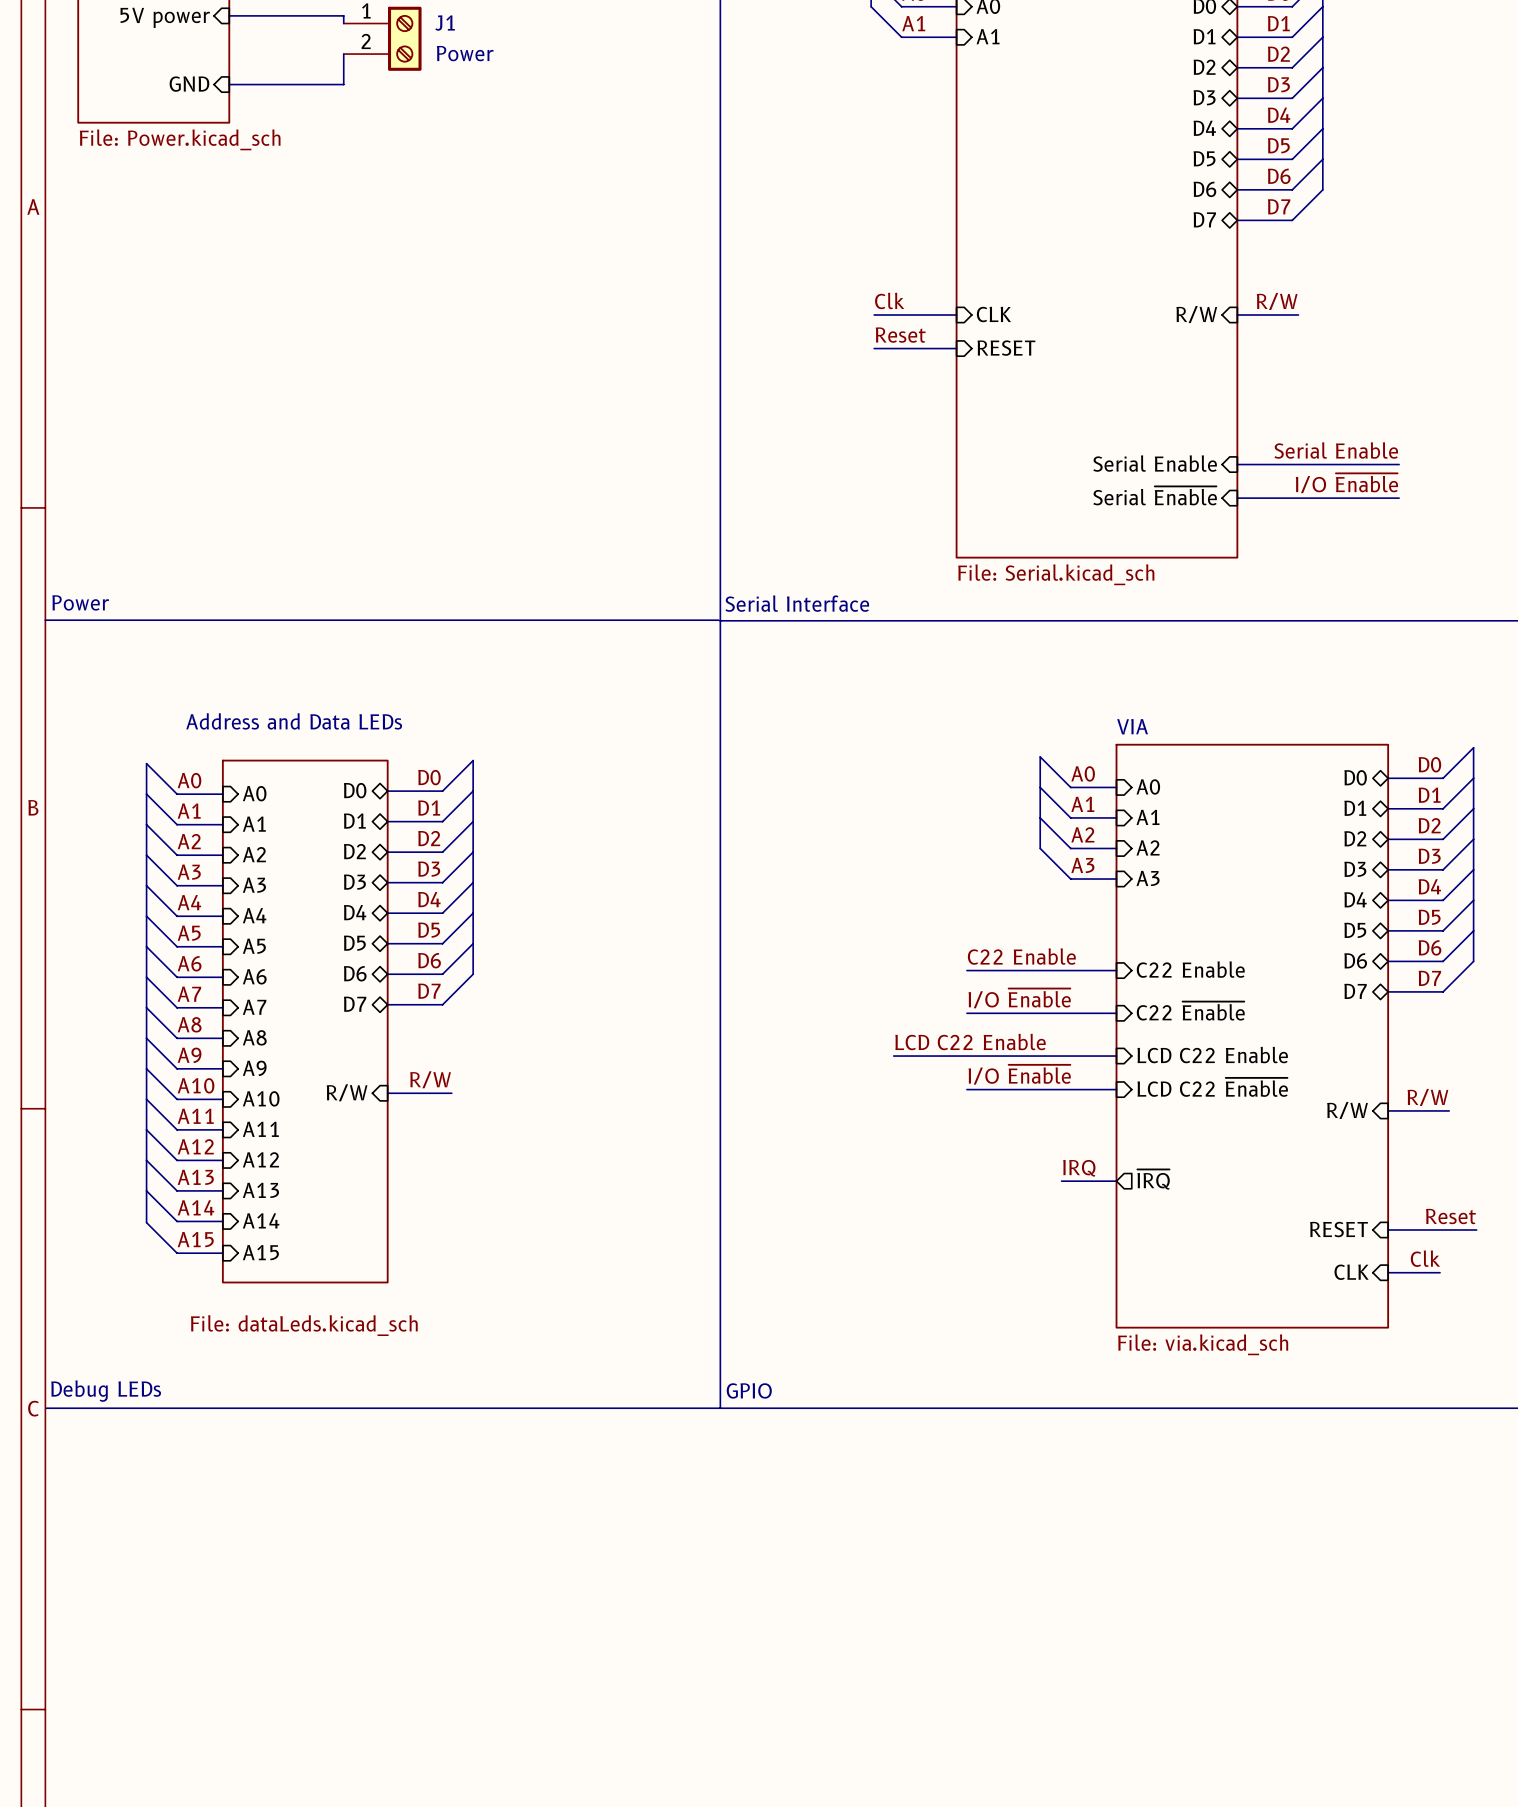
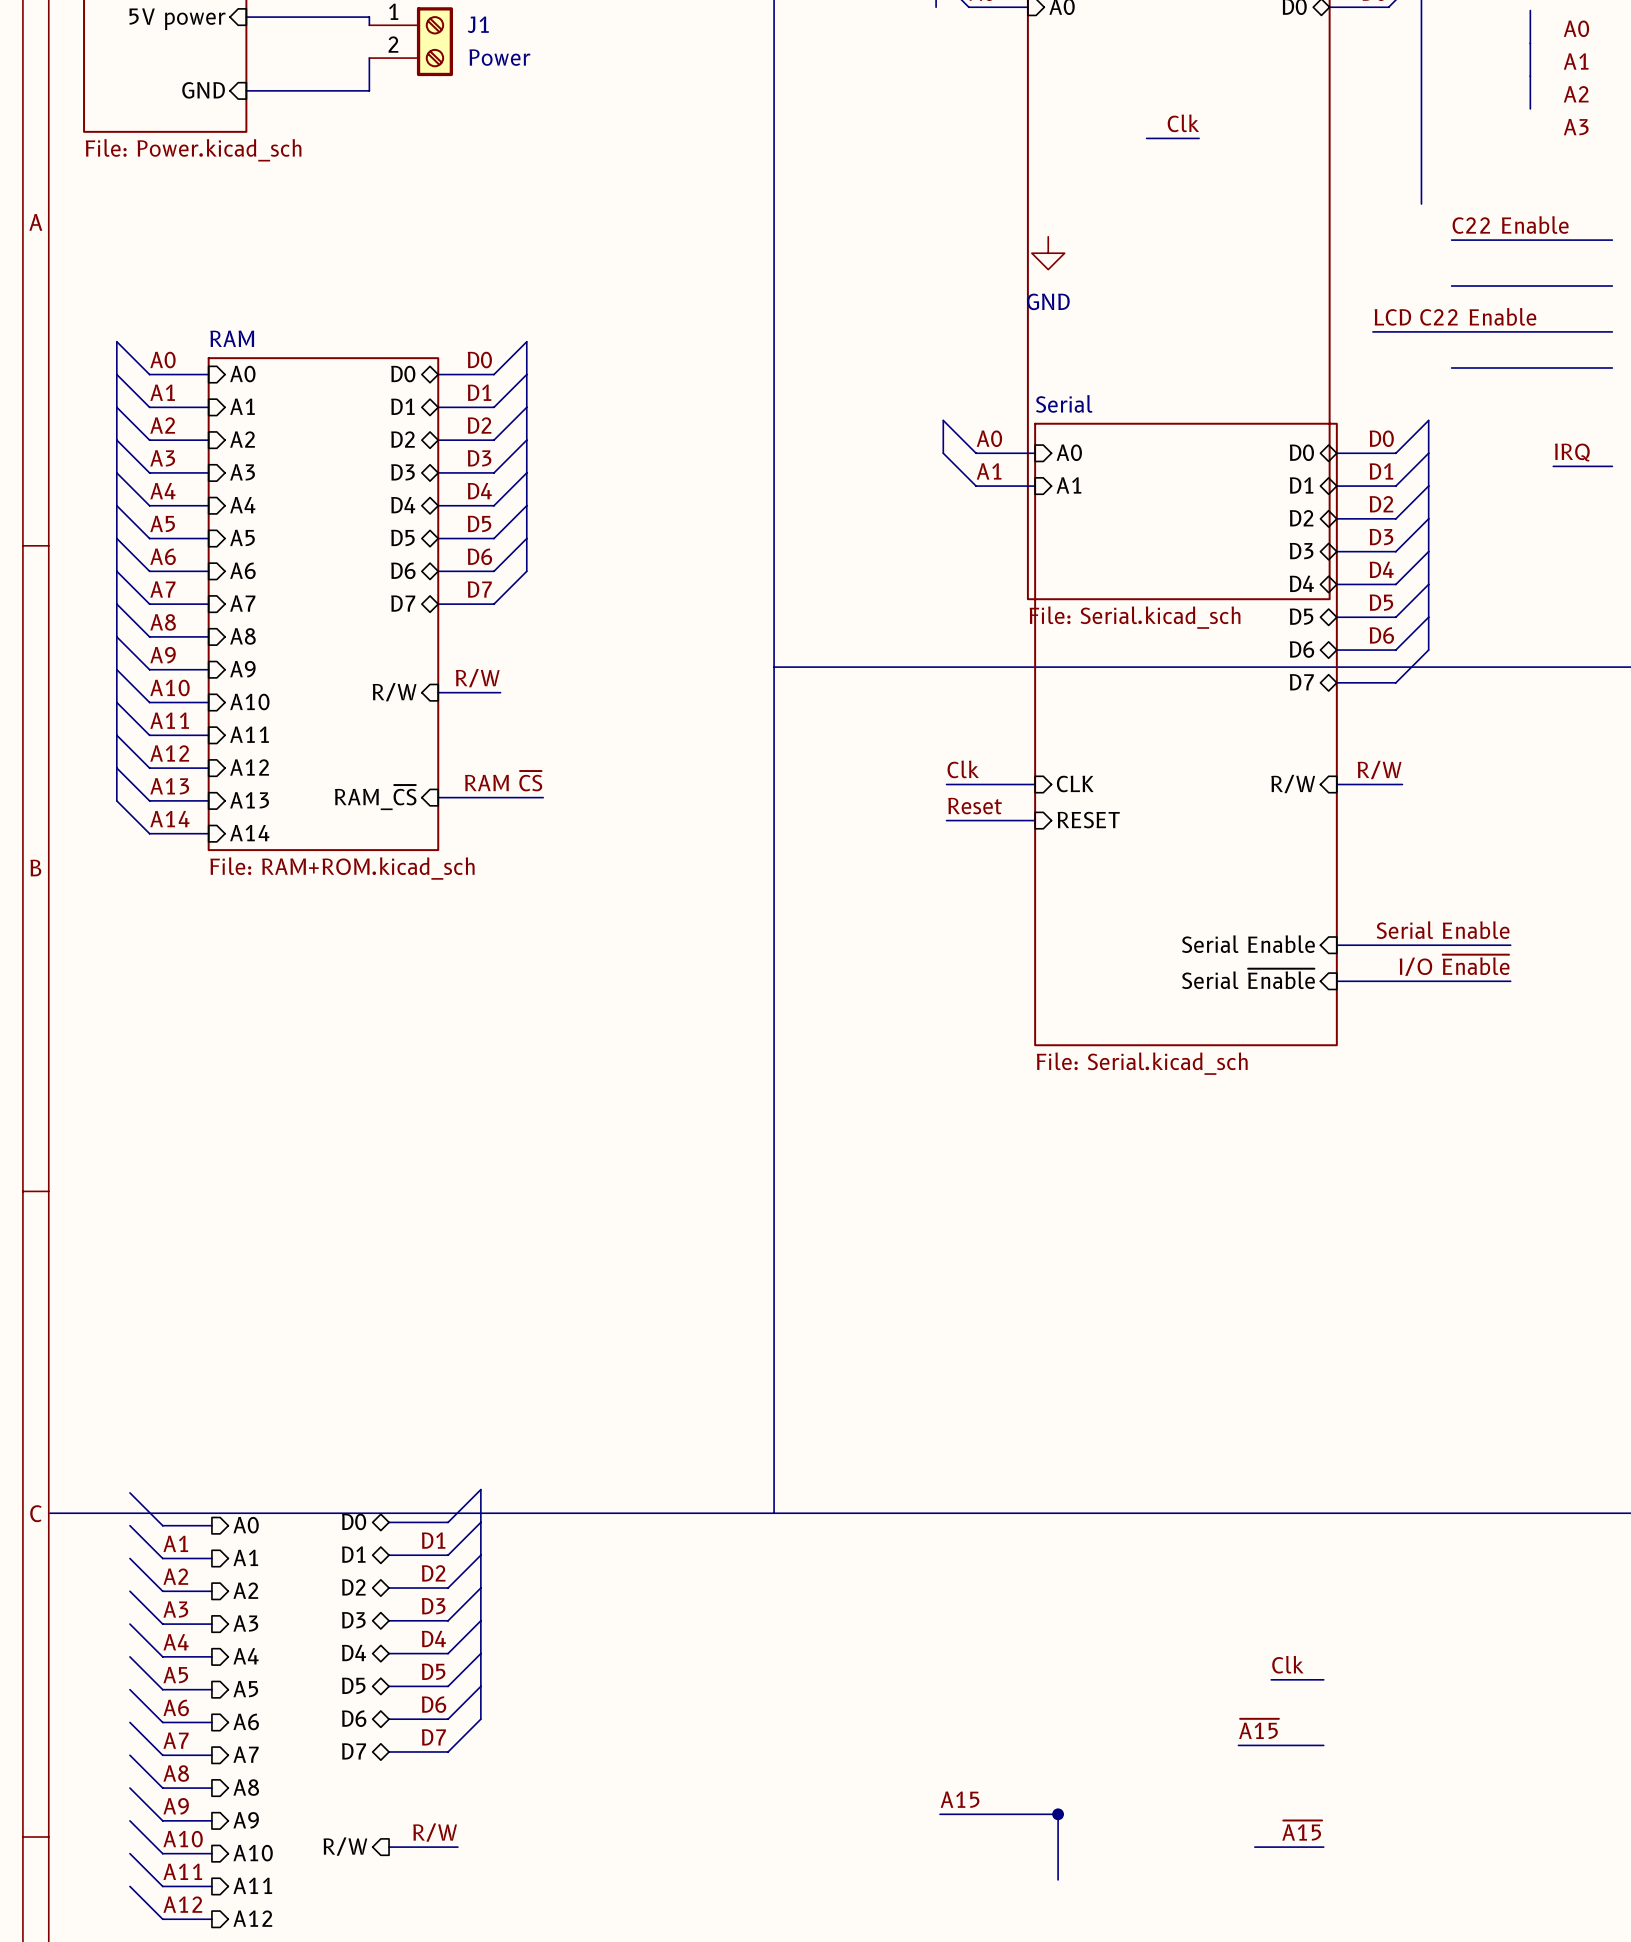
wire: (871, 6) (901, 37) (956, 37) -> none
wire: (1322, 6) (1292, 37) (1237, 37) -> none
bus: none -> (1530, 10) (1530, 108)
label: A1 (913, 23) -> none
label: D1 (1278, 23) -> none
label: none -> A0 (1576, 28)
sheet pin: A1 (988, 36) -> none
sheet pin: D1 (1204, 36) -> none
wire: (1322, 37) (1292, 67) (1237, 67) -> none
label: D2 (1278, 54) -> none
label: none -> A1 (1576, 61)
sheet pin: D2 (1204, 67) -> none
wire: (1322, 67) (1292, 98) (1237, 98) -> none
label: D3 (1278, 84) -> none
label: none -> A2 (1576, 94)
sheet pin: D3 (1204, 97) -> none
wire: (1322, 98) (1292, 128) (1237, 128) -> (1428, 420) (1395, 453) (1336, 453)
label: none -> Clk (1183, 123)
label: D4 (1279, 115) -> none
label: none -> A3 (1576, 127)
wire: none -> (1146, 138) (1199, 138)
sheet pin: D4 (1204, 128) -> none
wire: (1322, 128) (1292, 159) (1237, 159) -> (1428, 453) (1395, 486) (1336, 486)
label: D5 (1278, 145) -> none
sheet pin: D5 (1204, 158) -> none
wire: (1322, 159) (1292, 189) (1237, 189) -> (1428, 486) (1395, 518) (1336, 518)
label: D6 (1279, 176) -> none
sheet pin: D6 (1204, 189) -> none
wire: (1322, 189) (1292, 220) (1237, 220) -> (1428, 518) (1395, 551) (1336, 551)
label: D7 (1279, 206) -> none
label: none -> C22 Enable (1510, 225)
sheet pin: D7 (1204, 219) -> none
wire: none -> (1451, 240) (1612, 240)
power symbol: none -> GND (1048, 253)
wire: none -> (1451, 286) (1612, 286)
label: none -> LCD C22 Enable (1455, 316)
label: Clk (889, 300) -> none
label: R/W (1277, 301) -> none
wire: none -> (1372, 331) (1612, 331)
wire: (874, 314) (956, 314) -> none
sheet pin: CLK (993, 314) -> none
sheet pin: R/W (1196, 314) -> none
wire: (1237, 314) (1298, 314) -> none
wire: none -> (116, 341) (149, 374) (208, 374)
bus: none -> (116, 341) (116, 800)
wire: none -> (526, 341) (493, 374) (438, 374)
bus: none -> (526, 341) (526, 571)
label: none -> A0 (162, 360)
label: none -> D0 (479, 360)
label: Reset (900, 335) -> none
wire: none -> (1451, 367) (1612, 367)
wire: none -> (116, 374) (149, 407) (208, 407)
sheet pin: none -> A0 (242, 374)
sheet pin: none -> D0 (403, 374)
wire: none -> (526, 374) (493, 407) (438, 407)
wire: (874, 348) (956, 348) -> none
sheet pin: RESET (1006, 348) -> none
label: none -> A1 (162, 392)
label: none -> D1 (479, 392)
sheet pin: none -> A1 (242, 406)
sheet pin: none -> D1 (402, 406)
wire: none -> (116, 407) (149, 440) (208, 440)
wire: none -> (526, 407) (493, 440) (438, 440)
wire: none -> (943, 420) (976, 453) (1035, 453)
bus: none -> (943, 420) (943, 453)
bus: none -> (1428, 420) (1428, 650)
label: none -> A2 (162, 425)
label: none -> D2 (479, 425)
label: none -> A0 (989, 438)
label: none -> D0 (1381, 438)
wire: none -> (116, 440) (149, 472) (208, 472)
sheet pin: none -> A2 (242, 439)
sheet pin: none -> D2 (402, 439)
wire: none -> (526, 440) (493, 472) (438, 472)
wire: none -> (943, 453) (976, 486) (1035, 486)
sheet pin: none -> A0 (1069, 452)
sheet pin: none -> D0 (1301, 452)
label: none -> IRQ (1572, 452)
label: none -> A3 (162, 458)
label: none -> D3 (479, 458)
wire: none -> (1553, 466) (1612, 466)
label: none -> A1 (989, 471)
label: none -> D1 (1381, 471)
sheet pin: none -> A3 (242, 472)
sheet pin: none -> D3 (403, 472)
wire: none -> (116, 472) (149, 505) (208, 505)
wire: none -> (526, 472) (493, 505) (438, 505)
label: Serial Enable (1336, 450) -> none
sheet pin: none -> A1 (1068, 485)
sheet pin: none -> D1 (1301, 485)
label: none -> A4 (162, 491)
label: none -> D4 (479, 491)
sheet pin: Serial Enable (1155, 463) -> none
wire: (1237, 464) (1399, 464) -> none
label: none -> D2 (1381, 504)
wire: none -> (116, 505) (149, 538) (208, 538)
sheet pin: none -> A4 (242, 505)
sheet pin: none -> D4 (403, 505)
wire: none -> (526, 505) (493, 538) (438, 538)
sheet pin: none -> D2 (1301, 518)
label: I/O ~{Enable} (1346, 483) -> none
label: none -> A5 (162, 523)
label: none -> D5 (479, 523)
sheet pin: Serial ~{Enable} (1155, 495) -> none
wire: (1237, 498) (1399, 498) -> none
label: none -> D3 (1381, 537)
sheet pin: none -> A5 (242, 537)
sheet pin: none -> D5 (402, 537)
wire: none -> (116, 538) (149, 571) (208, 571)
wire: none -> (526, 538) (493, 571) (438, 571)
sheet pin: none -> D3 (1301, 551)
label: none -> A6 (163, 556)
label: none -> D6 (479, 556)
label: none -> D4 (1381, 569)
wire: none -> (116, 571) (149, 604) (208, 604)
sheet pin: none -> A6 (242, 570)
sheet pin: none -> D6 (403, 570)
wire: none -> (526, 571) (493, 604) (438, 604)
sheet pin: none -> D4 (1301, 583)
label: none -> A7 (162, 589)
label: none -> D7 (479, 589)
label: none -> D5 (1381, 602)
sheet pin: none -> A7 (242, 603)
sheet pin: none -> D7 (403, 603)
wire: none -> (116, 604) (149, 636) (208, 636)
sheet RAM: none -> File: RAM+ROM.kicad_sch (323, 604)
sheet pin: none -> D5 (1301, 616)
label: none -> A8 (163, 622)
label: none -> D6 (1381, 635)
wire: none -> (116, 636) (149, 669) (208, 669)
sheet pin: none -> A8 (242, 636)
text: Power (80, 602) -> none
text: Serial Interface (797, 603) -> none
sheet pin: none -> D6 (1301, 649)
label: none -> A9 (163, 655)
line: (45, 620) (718, 620) -> none
sheet pin: none -> A9 (242, 669)
wire: none -> (116, 669) (149, 702) (208, 702)
label: none -> R/W (477, 678)
sheet pin: none -> D7 (1301, 682)
label: none -> A10 (169, 687)
sheet pin: none -> R/W (394, 692)
wire: none -> (438, 692) (500, 692)
wire: none -> (116, 702) (149, 735) (208, 735)
sheet pin: none -> A10 (249, 701)
label: none -> A11 (169, 720)
sheet pin: none -> A11 (249, 734)
sheet Serial: none -> File: Serial.kicad_sch (1185, 734)
wire: none -> (116, 735) (149, 768) (208, 768)
label: none -> A12 (169, 753)
wire: none -> (116, 768) (149, 800) (208, 800)
sheet pin: none -> A12 (249, 767)
label: none -> Clk (963, 769)
label: none -> R/W (1379, 769)
label: none -> RAM ~{CS} (503, 781)
sheet pin: none -> CLK (1075, 783)
sheet pin: none -> R/W (1293, 784)
wire: none -> (946, 784) (1035, 784)
wire: none -> (1336, 784) (1402, 784)
label: none -> A13 (169, 786)
sheet pin: none -> RAM_~{CS} (375, 797)
wire: none -> (438, 797) (543, 797)
sheet pin: none -> A13 (249, 800)
wire: none -> (116, 800) (149, 833) (208, 833)
wire: (1473, 747) (1443, 778) (1388, 778) -> (1428, 551) (1395, 584) (1336, 584)
bus: (1473, 747) (1473, 961) -> none
label: none -> Reset (975, 806)
wire: (1040, 756) (1070, 787) (1116, 787) -> none
bus: (1040, 756) (1040, 848) -> none
wire: (473, 760) (442, 791) (387, 791) -> none
bus: (473, 760) (473, 974) -> none
label: none -> A14 (169, 819)
wire: (146, 763) (177, 794) (222, 794) -> none
bus: (146, 763) (146, 1222) -> none
wire: none -> (946, 820) (1035, 820)
sheet pin: none -> RESET (1088, 820)
label: D0 (1429, 764) -> none
label: A0 (1083, 773) -> none
sheet pin: none -> A14 (249, 833)
label: D0 (429, 777) -> none
sheet pin: D0 (1355, 777) -> none
wire: (1473, 778) (1443, 808) (1388, 808) -> (1428, 584) (1395, 617) (1336, 617)
label: A0 (189, 780) -> none
sheet pin: A0 (1148, 786) -> none
wire: (1040, 787) (1070, 817) (1116, 817) -> none
sheet pin: D0 (355, 790) -> none
wire: (473, 791) (442, 821) (387, 821) -> none
sheet pin: A0 (254, 793) -> none
wire: (146, 794) (177, 824) (222, 824) -> none
label: D1 (1429, 795) -> none
label: A1 (1082, 804) -> none
label: D1 (429, 808) -> none
sheet pin: D1 (1355, 808) -> none
wire: (1473, 808) (1443, 839) (1388, 839) -> (1428, 617) (1395, 650) (1336, 650)
label: A1 (189, 811) -> none
wire: (1040, 817) (1070, 848) (1116, 848) -> none
sheet pin: A1 (1148, 817) -> none
sheet pin: D1 (354, 821) -> none
wire: (473, 821) (442, 852) (387, 852) -> none
wire: (146, 824) (177, 855) (222, 855) -> none
sheet pin: A1 (254, 824) -> none
label: D2 (1429, 825) -> none
label: A2 (1082, 834) -> none
label: D2 (429, 838) -> none
sheet pin: D2 (1355, 838) -> none
wire: (1473, 839) (1443, 869) (1388, 869) -> (1428, 650) (1395, 682) (1336, 682)
label: A2 (189, 841) -> none
sheet pin: A2 (1148, 847) -> none
wire: (1040, 848) (1070, 879) (1116, 879) -> none
sheet pin: D2 (354, 851) -> none
wire: (473, 852) (442, 882) (387, 882) -> none
sheet pin: A2 (254, 854) -> none
wire: (146, 855) (177, 885) (222, 885) -> none
label: D3 (1429, 856) -> none
label: A3 (1082, 865) -> none
label: none -> Serial Enable (1443, 930)
label: D3 (429, 869) -> none
sheet pin: D3 (1355, 869) -> none
wire: (1473, 869) (1443, 900) (1388, 900) -> none
label: A3 (189, 872) -> none
sheet pin: A3 (1148, 878) -> none
sheet pin: none -> Serial Enable (1248, 944)
wire: none -> (1336, 945) (1510, 945)
sheet pin: D3 (354, 882) -> none
wire: (473, 882) (442, 913) (387, 913) -> none
wire: (146, 885) (177, 916) (222, 916) -> none
sheet pin: A3 (254, 885) -> none
label: D4 (1429, 886) -> none
label: none -> I/O ~{Enable} (1454, 965)
label: D4 (429, 899) -> none
sheet pin: D4 (1355, 899) -> none
wire: (1473, 900) (1443, 930) (1388, 930) -> none
label: A4 (189, 902) -> none
sheet pin: none -> Serial ~{Enable} (1248, 978)
sheet pin: D4 (355, 912) -> none
wire: (473, 913) (442, 943) (387, 943) -> none
wire: none -> (1336, 981) (1510, 981)
sheet pin: A4 (254, 915) -> none
wire: (146, 916) (177, 946) (222, 946) -> none
label: D5 (1429, 917) -> none
label: D5 (429, 930) -> none
sheet pin: D5 (1355, 930) -> none
wire: (1473, 930) (1443, 961) (1388, 961) -> none
label: A5 (189, 933) -> none
sheet pin: D5 (354, 943) -> none
wire: (473, 943) (442, 974) (387, 974) -> none
wire: (146, 946) (177, 977) (222, 977) -> none
sheet pin: A5 (254, 946) -> none
label: D6 (1430, 947) -> none
label: C22 Enable (1021, 956) -> none
label: D6 (429, 960) -> none
sheet pin: D6 (1355, 960) -> none
wire: (1473, 961) (1443, 991) (1388, 991) -> none
label: A6 (189, 963) -> none
sheet pin: C22 Enable (1190, 969) -> none
wire: (966, 970) (1116, 970) -> none
sheet pin: D6 (355, 973) -> none
wire: (473, 974) (442, 1004) (387, 1004) -> none
sheet pin: A6 (254, 976) -> none
wire: (146, 977) (177, 1007) (222, 1007) -> none
label: D7 (1429, 978) -> none
label: D7 (429, 991) -> none
sheet pin: D7 (1355, 991) -> none
label: A7 (189, 994) -> none
label: I/O ~{Enable} (1019, 998) -> none
sheet pin: D7 (355, 1004) -> none
wire: (146, 1007) (177, 1038) (222, 1038) -> none
sheet pin: A7 (254, 1007) -> none
sheet pin: C22 ~{Enable} (1190, 1011) -> none
wire: (966, 1013) (1116, 1013) -> none
sheet Address and Data LEDs: File: dataLeds.kicad_sch (305, 1021) -> none
label: A8 (189, 1024) -> none
sheet VIA: File: via.kicad_sch (1252, 1036) -> none
sheet pin: A8 (254, 1037) -> none
wire: (146, 1038) (177, 1068) (222, 1068) -> none
label: LCD C22 Enable (970, 1041) -> none
label: A9 (189, 1055) -> none
sheet pin: LCD C22 Enable (1212, 1055) -> none
wire: (893, 1056) (1116, 1056) -> none
wire: (146, 1068) (177, 1099) (222, 1099) -> none
sheet pin: A9 (254, 1068) -> none
label: I/O ~{Enable} (1019, 1074) -> none
label: R/W (430, 1079) -> none
label: A10 (196, 1085) -> none
sheet pin: LCD C22 ~{Enable} (1212, 1087) -> none
wire: (966, 1089) (1116, 1089) -> none
sheet pin: R/W (347, 1092) -> none
wire: (387, 1093) (451, 1093) -> none
label: R/W (1427, 1097) -> none
sheet pin: A10 (261, 1098) -> none
wire: (146, 1099) (177, 1129) (222, 1129) -> (129, 1492) (162, 1525) (211, 1525)
sheet pin: R/W (1347, 1110) -> none
wire: (1388, 1110) (1449, 1110) -> none
label: A11 (195, 1116) -> none
wire: (146, 1129) (177, 1160) (222, 1160) -> (129, 1525) (162, 1558) (211, 1558)
sheet pin: A11 (260, 1129) -> none
label: A12 (195, 1146) -> none
sheet pin: A12 (260, 1159) -> none
wire: (146, 1160) (177, 1190) (222, 1190) -> (129, 1558) (162, 1591) (211, 1591)
label: IRQ (1079, 1168) -> none
label: A13 (195, 1177) -> none
sheet pin: ~{IRQ} (1153, 1179) -> none
wire: (1061, 1181) (1116, 1181) -> none
wire: (146, 1190) (177, 1221) (222, 1221) -> (129, 1591) (162, 1624) (211, 1624)
sheet pin: A13 (260, 1190) -> none
label: A14 (195, 1207) -> none
label: Reset (1450, 1216) -> none
sheet pin: A14 (261, 1220) -> none
wire: (146, 1222) (177, 1253) (222, 1253) -> (129, 1624) (162, 1656) (211, 1656)
sheet pin: RESET (1338, 1229) -> none
wire: (1388, 1229) (1476, 1229) -> none
label: A15 (195, 1239) -> none
sheet pin: A15 (260, 1252) -> none
label: Clk (1425, 1258) -> none
sheet pin: CLK (1351, 1272) -> none
wire: (1388, 1272) (1440, 1272) -> none
wire: none -> (480, 1489) (448, 1522) (389, 1522)
bus: none -> (480, 1489) (480, 1719)
text: GPIO (749, 1390) -> none
text: Debug LEDs (106, 1391) -> none
sheet pin: none -> D0 (354, 1521)
wire: none -> (480, 1522) (448, 1555) (389, 1555)
sheet pin: none -> A0 (246, 1525)
label: none -> D1 (433, 1540)
label: none -> A1 (175, 1543)
sheet pin: none -> D1 (353, 1554)
wire: none -> (480, 1555) (448, 1588) (389, 1588)
sheet pin: none -> A1 (245, 1557)
label: none -> D2 (433, 1573)
label: none -> A2 (175, 1576)
sheet pin: none -> D2 (353, 1587)
wire: none -> (480, 1588) (448, 1620) (389, 1620)
sheet pin: none -> A2 (245, 1590)
label: none -> D3 (433, 1606)
label: none -> A3 (175, 1609)
sheet pin: none -> D3 (353, 1620)
wire: none -> (480, 1620) (448, 1653) (389, 1653)
sheet pin: none -> A3 (245, 1623)
label: none -> D4 (433, 1638)
label: none -> A4 (176, 1642)
sheet pin: none -> D4 (354, 1652)
wire: none -> (480, 1653) (448, 1686) (389, 1686)
wire: none -> (129, 1656) (162, 1689) (211, 1689)
sheet pin: none -> A4 (246, 1656)
label: none -> Clk (1287, 1664)
label: none -> D5 (433, 1671)
label: none -> A5 (175, 1675)
wire: none -> (1271, 1679) (1323, 1679)
sheet pin: none -> D5 (353, 1685)
wire: none -> (480, 1686) (448, 1719) (389, 1719)
sheet pin: none -> A5 (245, 1689)
wire: none -> (129, 1689) (162, 1722) (211, 1722)
label: none -> D6 (434, 1704)
label: none -> A6 (176, 1707)
sheet pin: none -> D6 (354, 1718)
wire: none -> (480, 1719) (448, 1751) (389, 1751)
wire: none -> (129, 1722) (162, 1755) (211, 1755)
sheet pin: none -> A6 (246, 1721)
label: none -> ~{A15} (1259, 1728)
label: none -> D7 (433, 1737)
label: none -> A7 (176, 1740)
wire: none -> (1238, 1745) (1323, 1745)
sheet pin: none -> D7 (354, 1751)
sheet pin: none -> A7 (246, 1754)
wire: none -> (129, 1755) (162, 1788) (211, 1788)
label: none -> A8 (176, 1773)
wire: none -> (129, 1788) (162, 1820) (211, 1820)
sheet pin: none -> A8 (246, 1787)
label: none -> A15 (960, 1799)
label: none -> A9 (176, 1806)
wire: none -> (940, 1814) (1058, 1814) (1058, 1879)
junction: none -> (1058, 1814)
wire: none -> (129, 1820) (162, 1853) (211, 1853)
sheet pin: none -> A9 (246, 1820)
label: none -> ~{A15} (1302, 1830)
label: none -> R/W (435, 1832)
label: none -> A10 (183, 1839)
sheet pin: none -> R/W (345, 1846)
wire: none -> (389, 1847) (457, 1847)
wire: none -> (1254, 1847) (1323, 1847)
sheet pin: none -> A10 (253, 1853)
wire: none -> (129, 1853) (162, 1886) (211, 1886)
label: none -> A11 (182, 1871)
sheet pin: none -> A11 (252, 1885)
wire: none -> (129, 1886) (162, 1919) (211, 1919)
label: none -> A12 (182, 1904)
sheet pin: none -> A12 (252, 1918)

